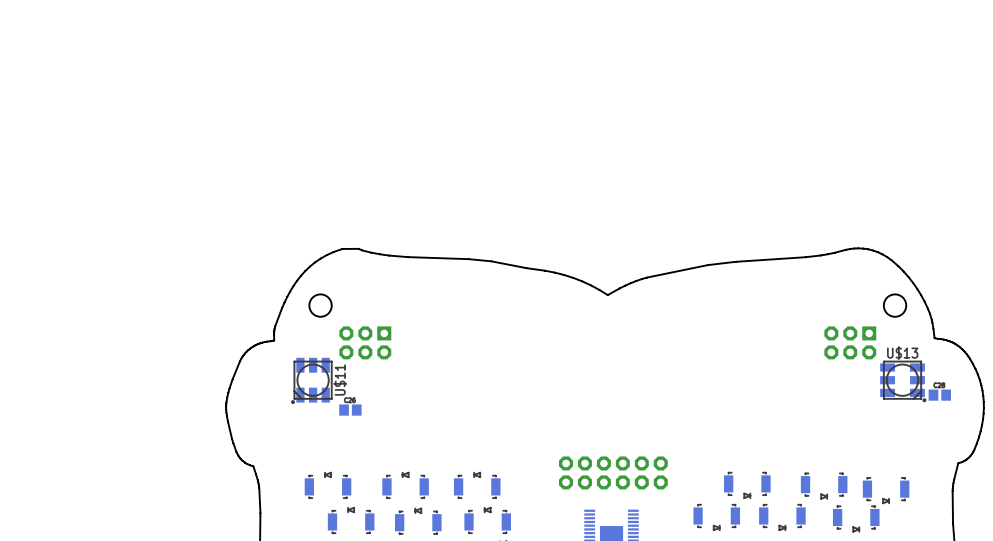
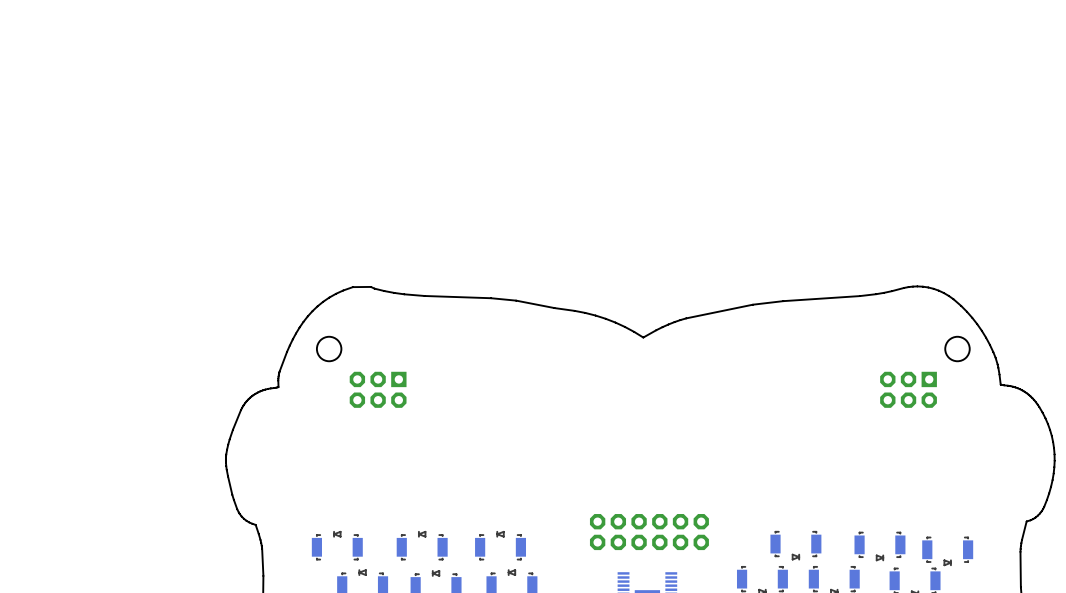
U$11: (311, 380) -> none
U$13: (903, 381) -> none
part: (939, 395) -> none
part: (350, 410) -> none

